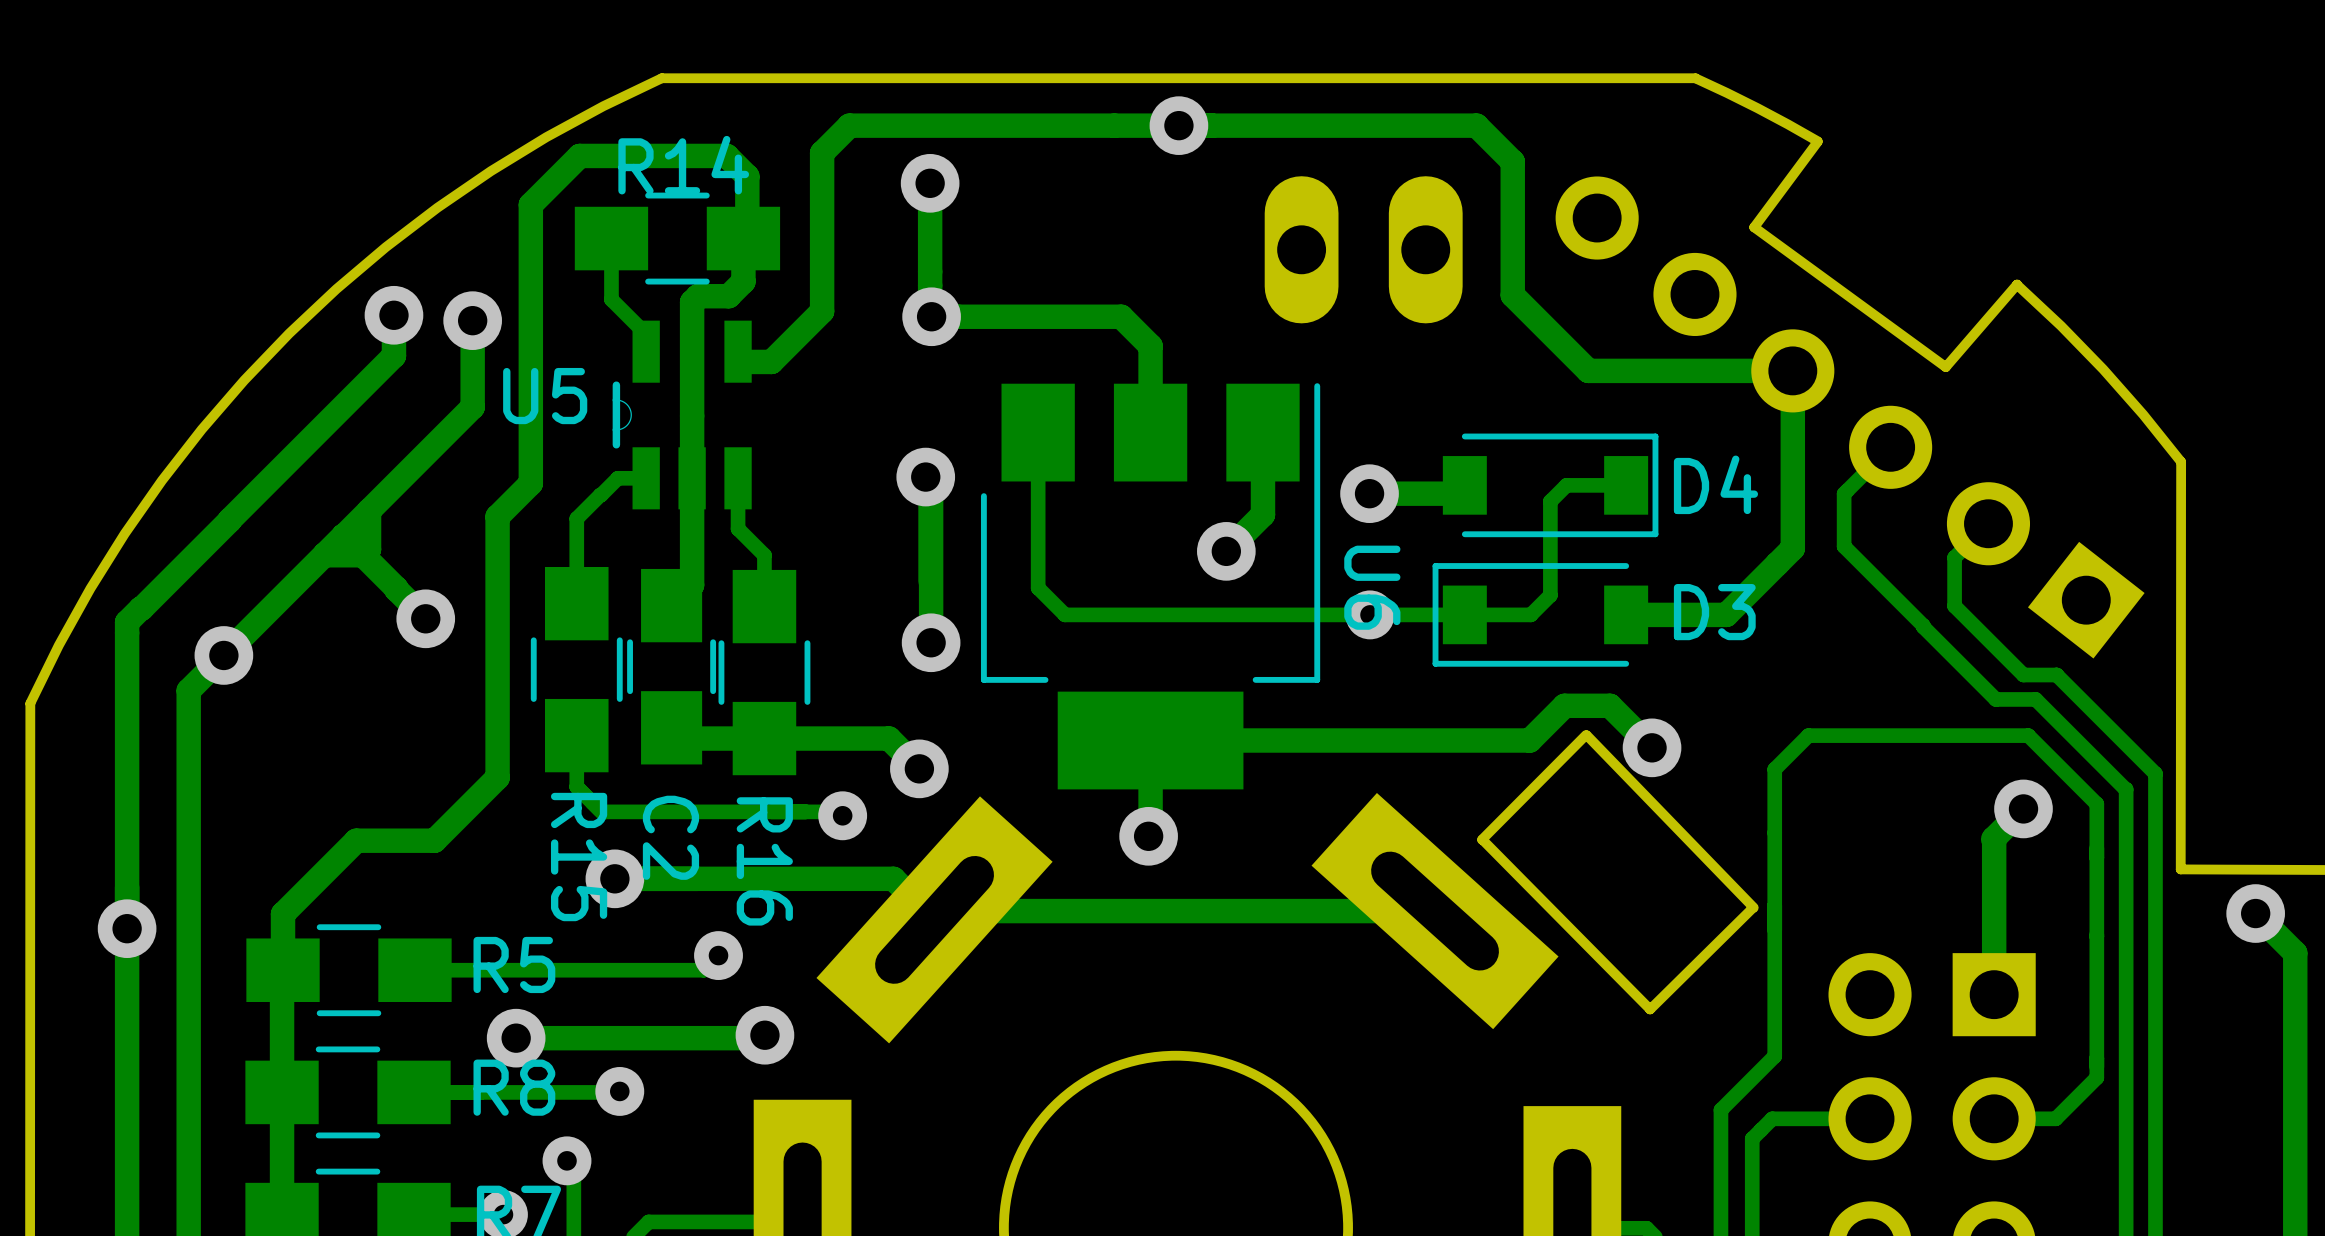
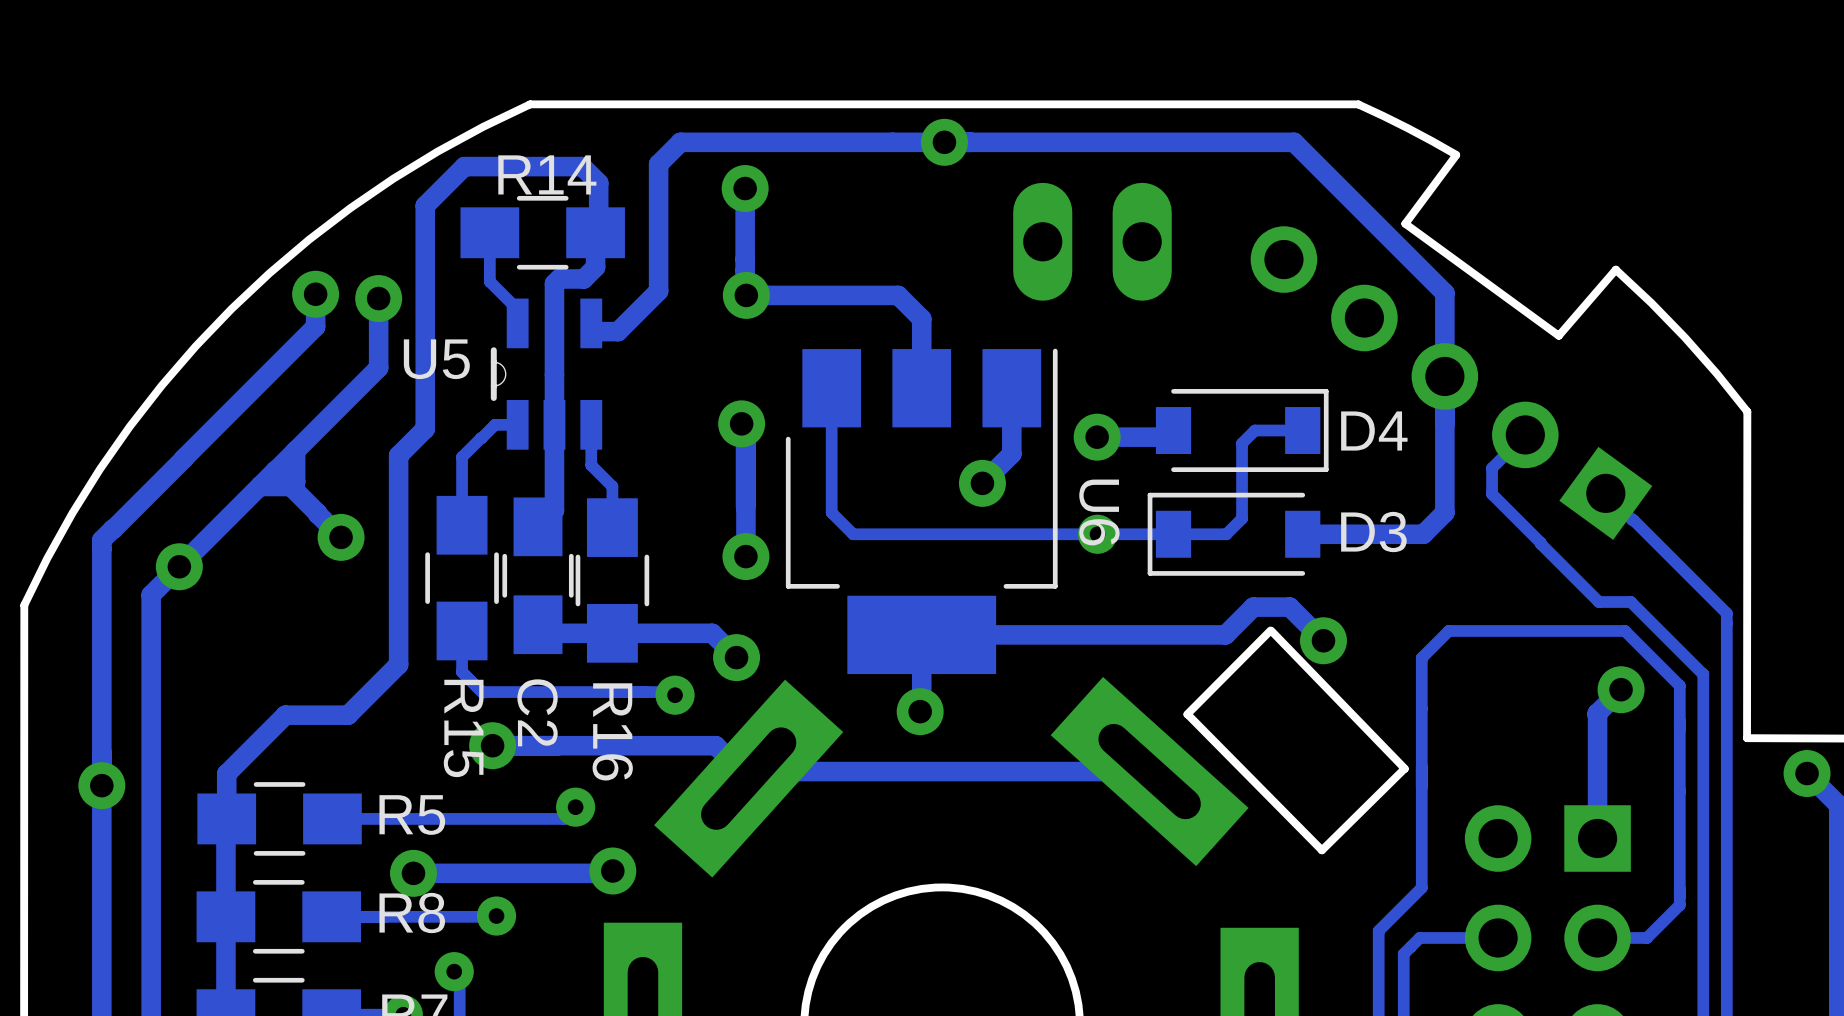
track: (1476, 125) (1512, 161) (1512, 295) (1588, 370) (1792, 370) (1792, 548) (1726, 614) -> (1182, 142) (1294, 142) (1444, 293) (1444, 512) (1423, 534) (1383, 534)
part footprint: [1555, 176, 2145, 659] -> [1250, 226, 1653, 540]
track: (1890, 447) (1844, 493) (1844, 546) (1862, 564) -> (1525, 434) (1492, 468) (1492, 494)
track: (1988, 523) (1954, 557) (1954, 606) (2023, 675) (2056, 675) (2155, 773) -> (1605, 493) (1726, 613) (1726, 661)

